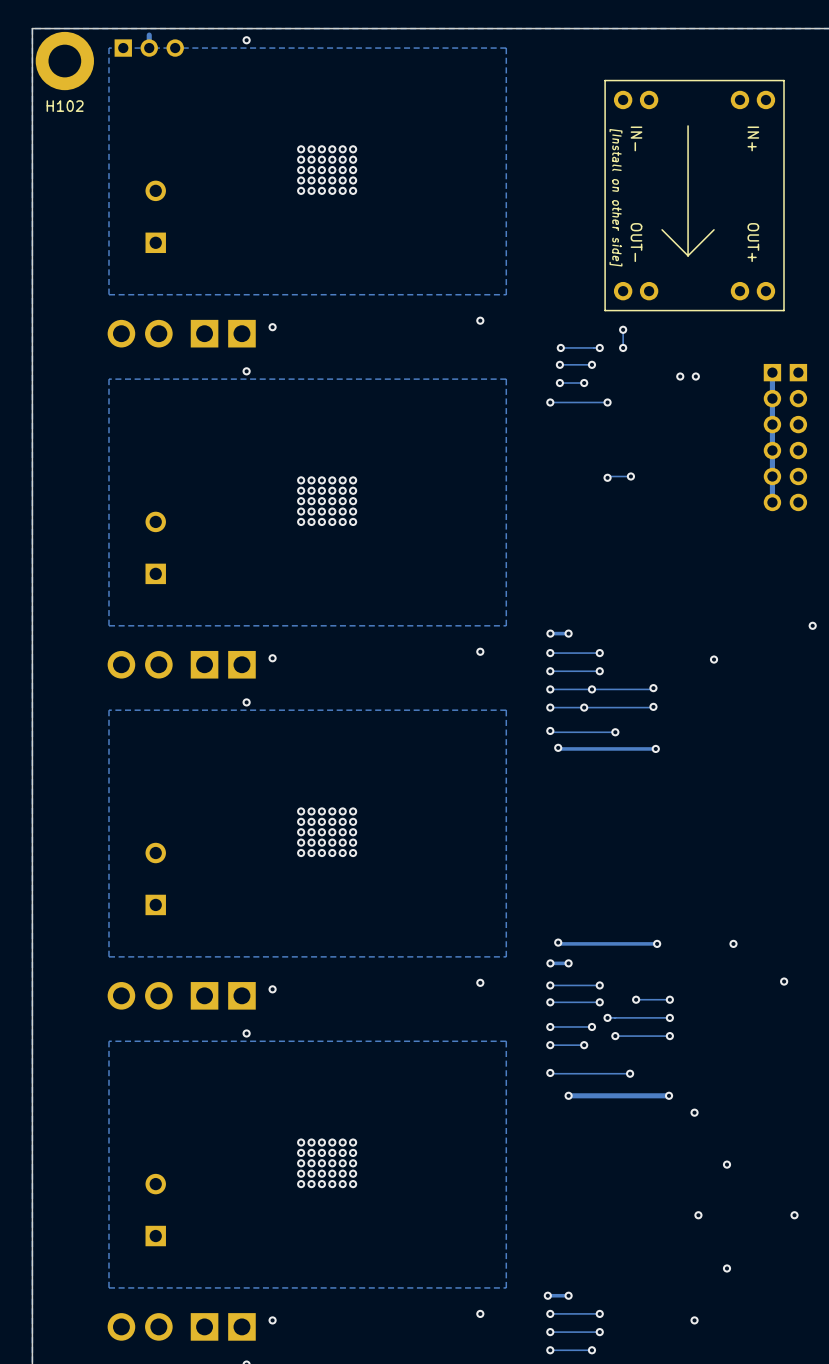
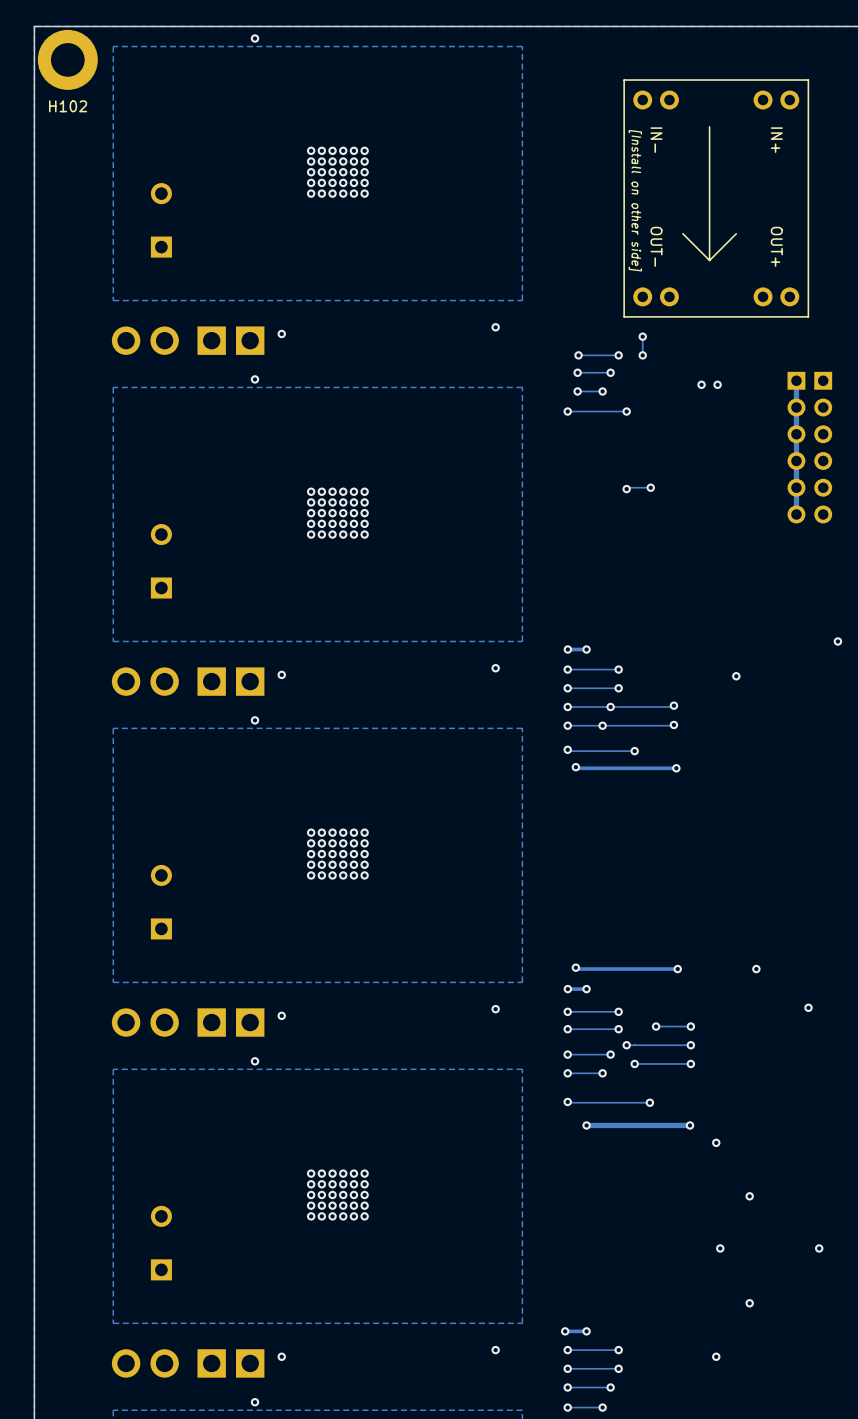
track: (149, 35) (149, 48) -> none
part: (149, 48) -> none

